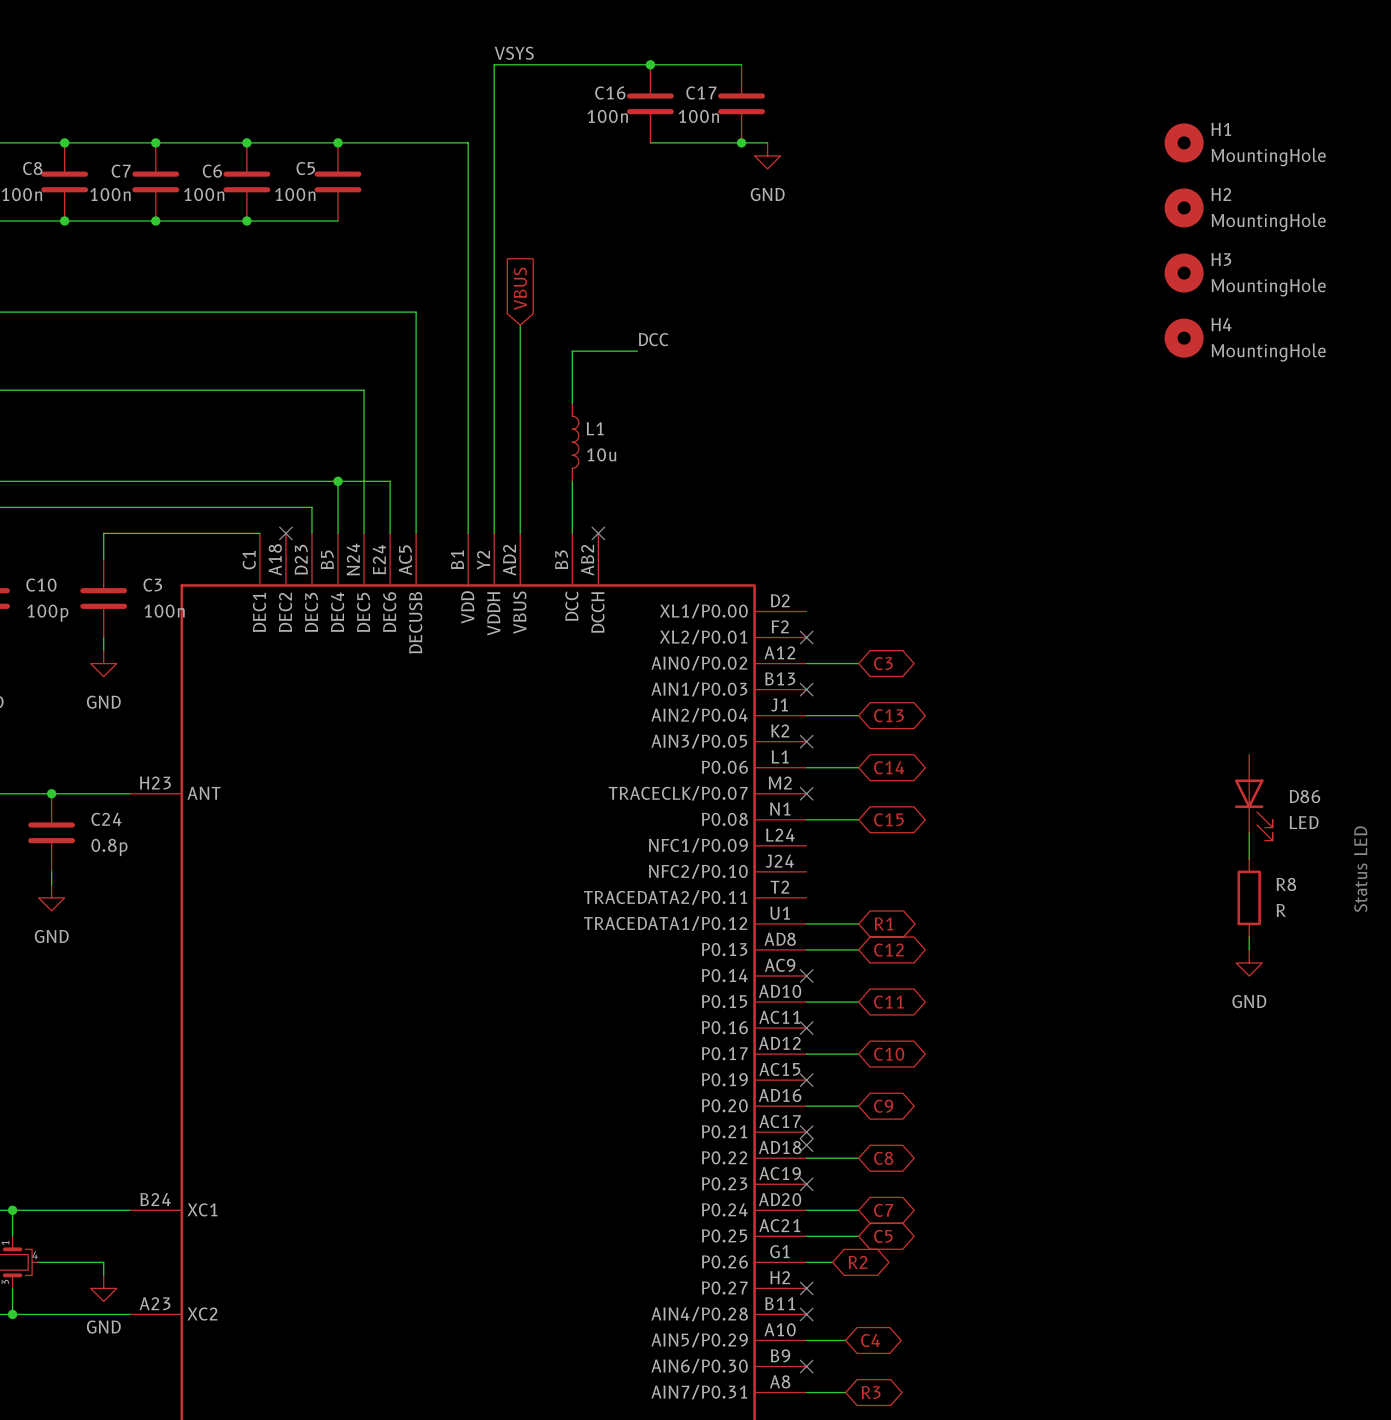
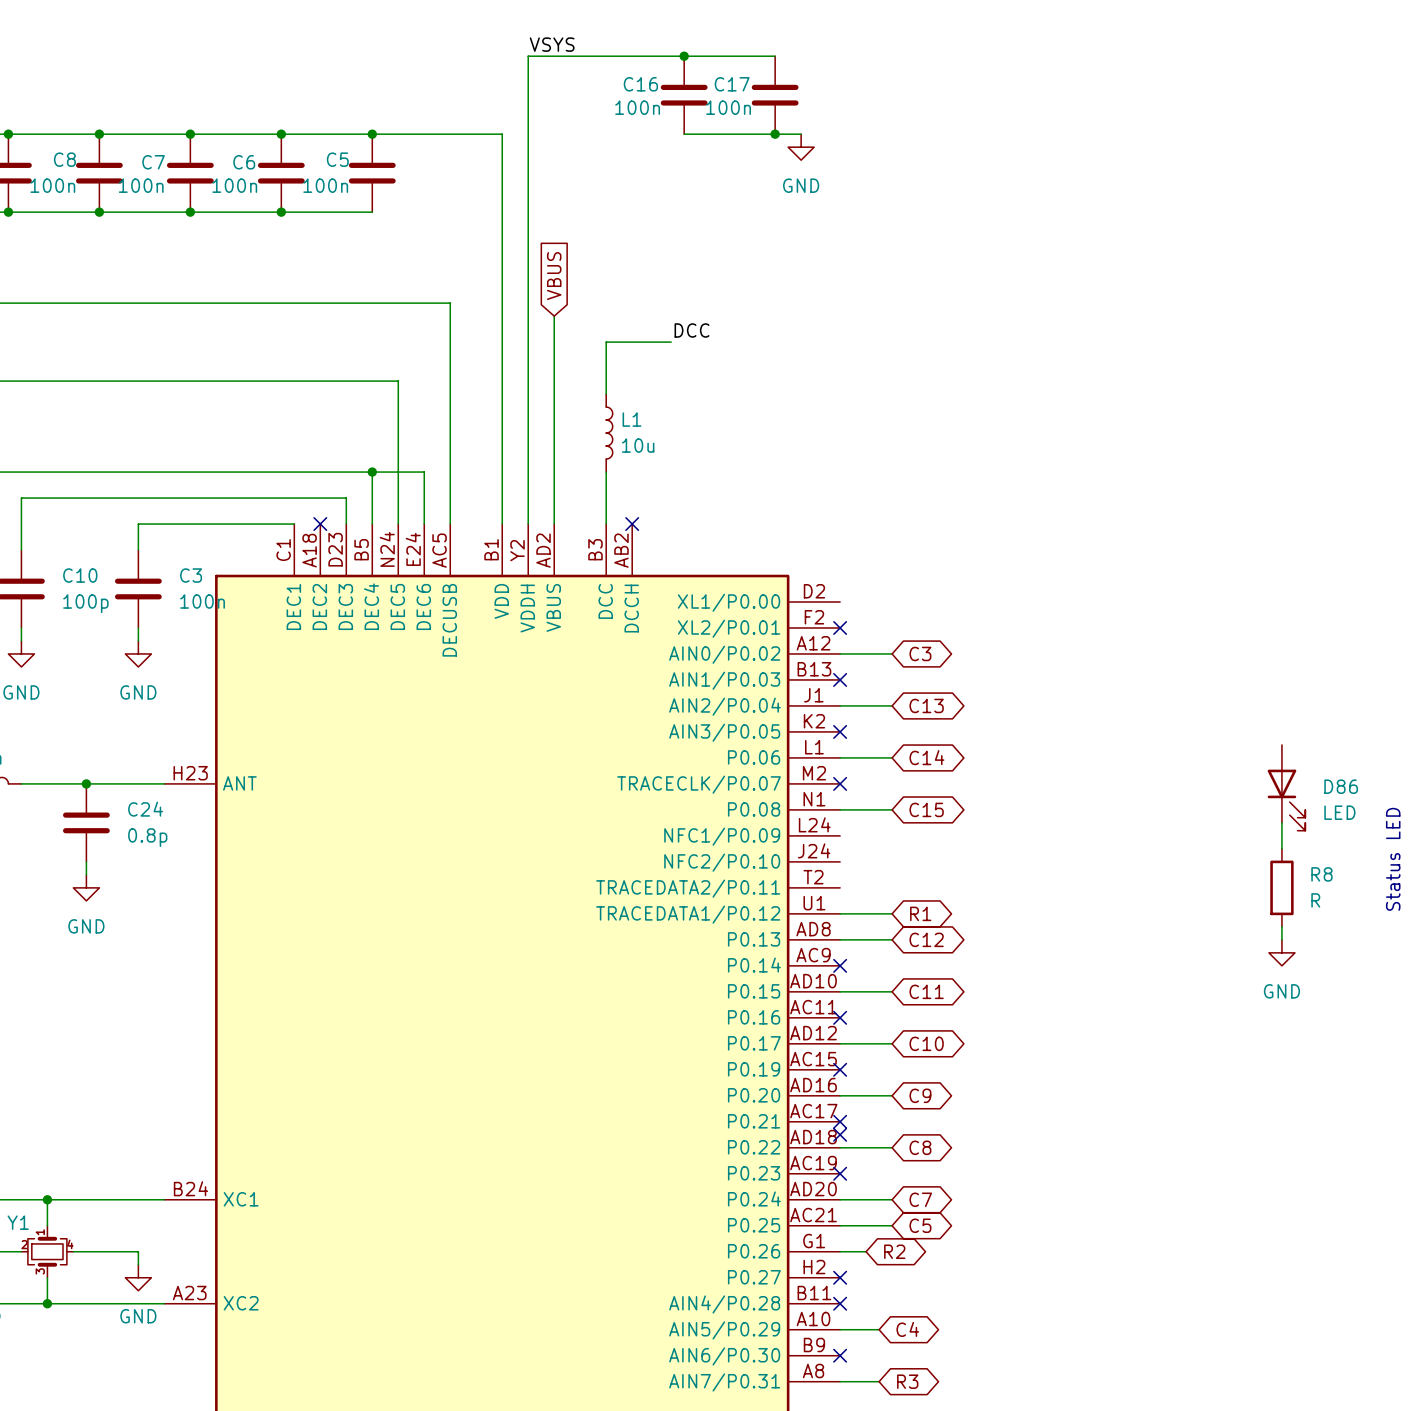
H1: MountingHole (1184, 142) -> none
H2: MountingHole (1184, 207) -> none
H3: MountingHole (1184, 273) -> none
H4: MountingHole (1184, 338) -> none

